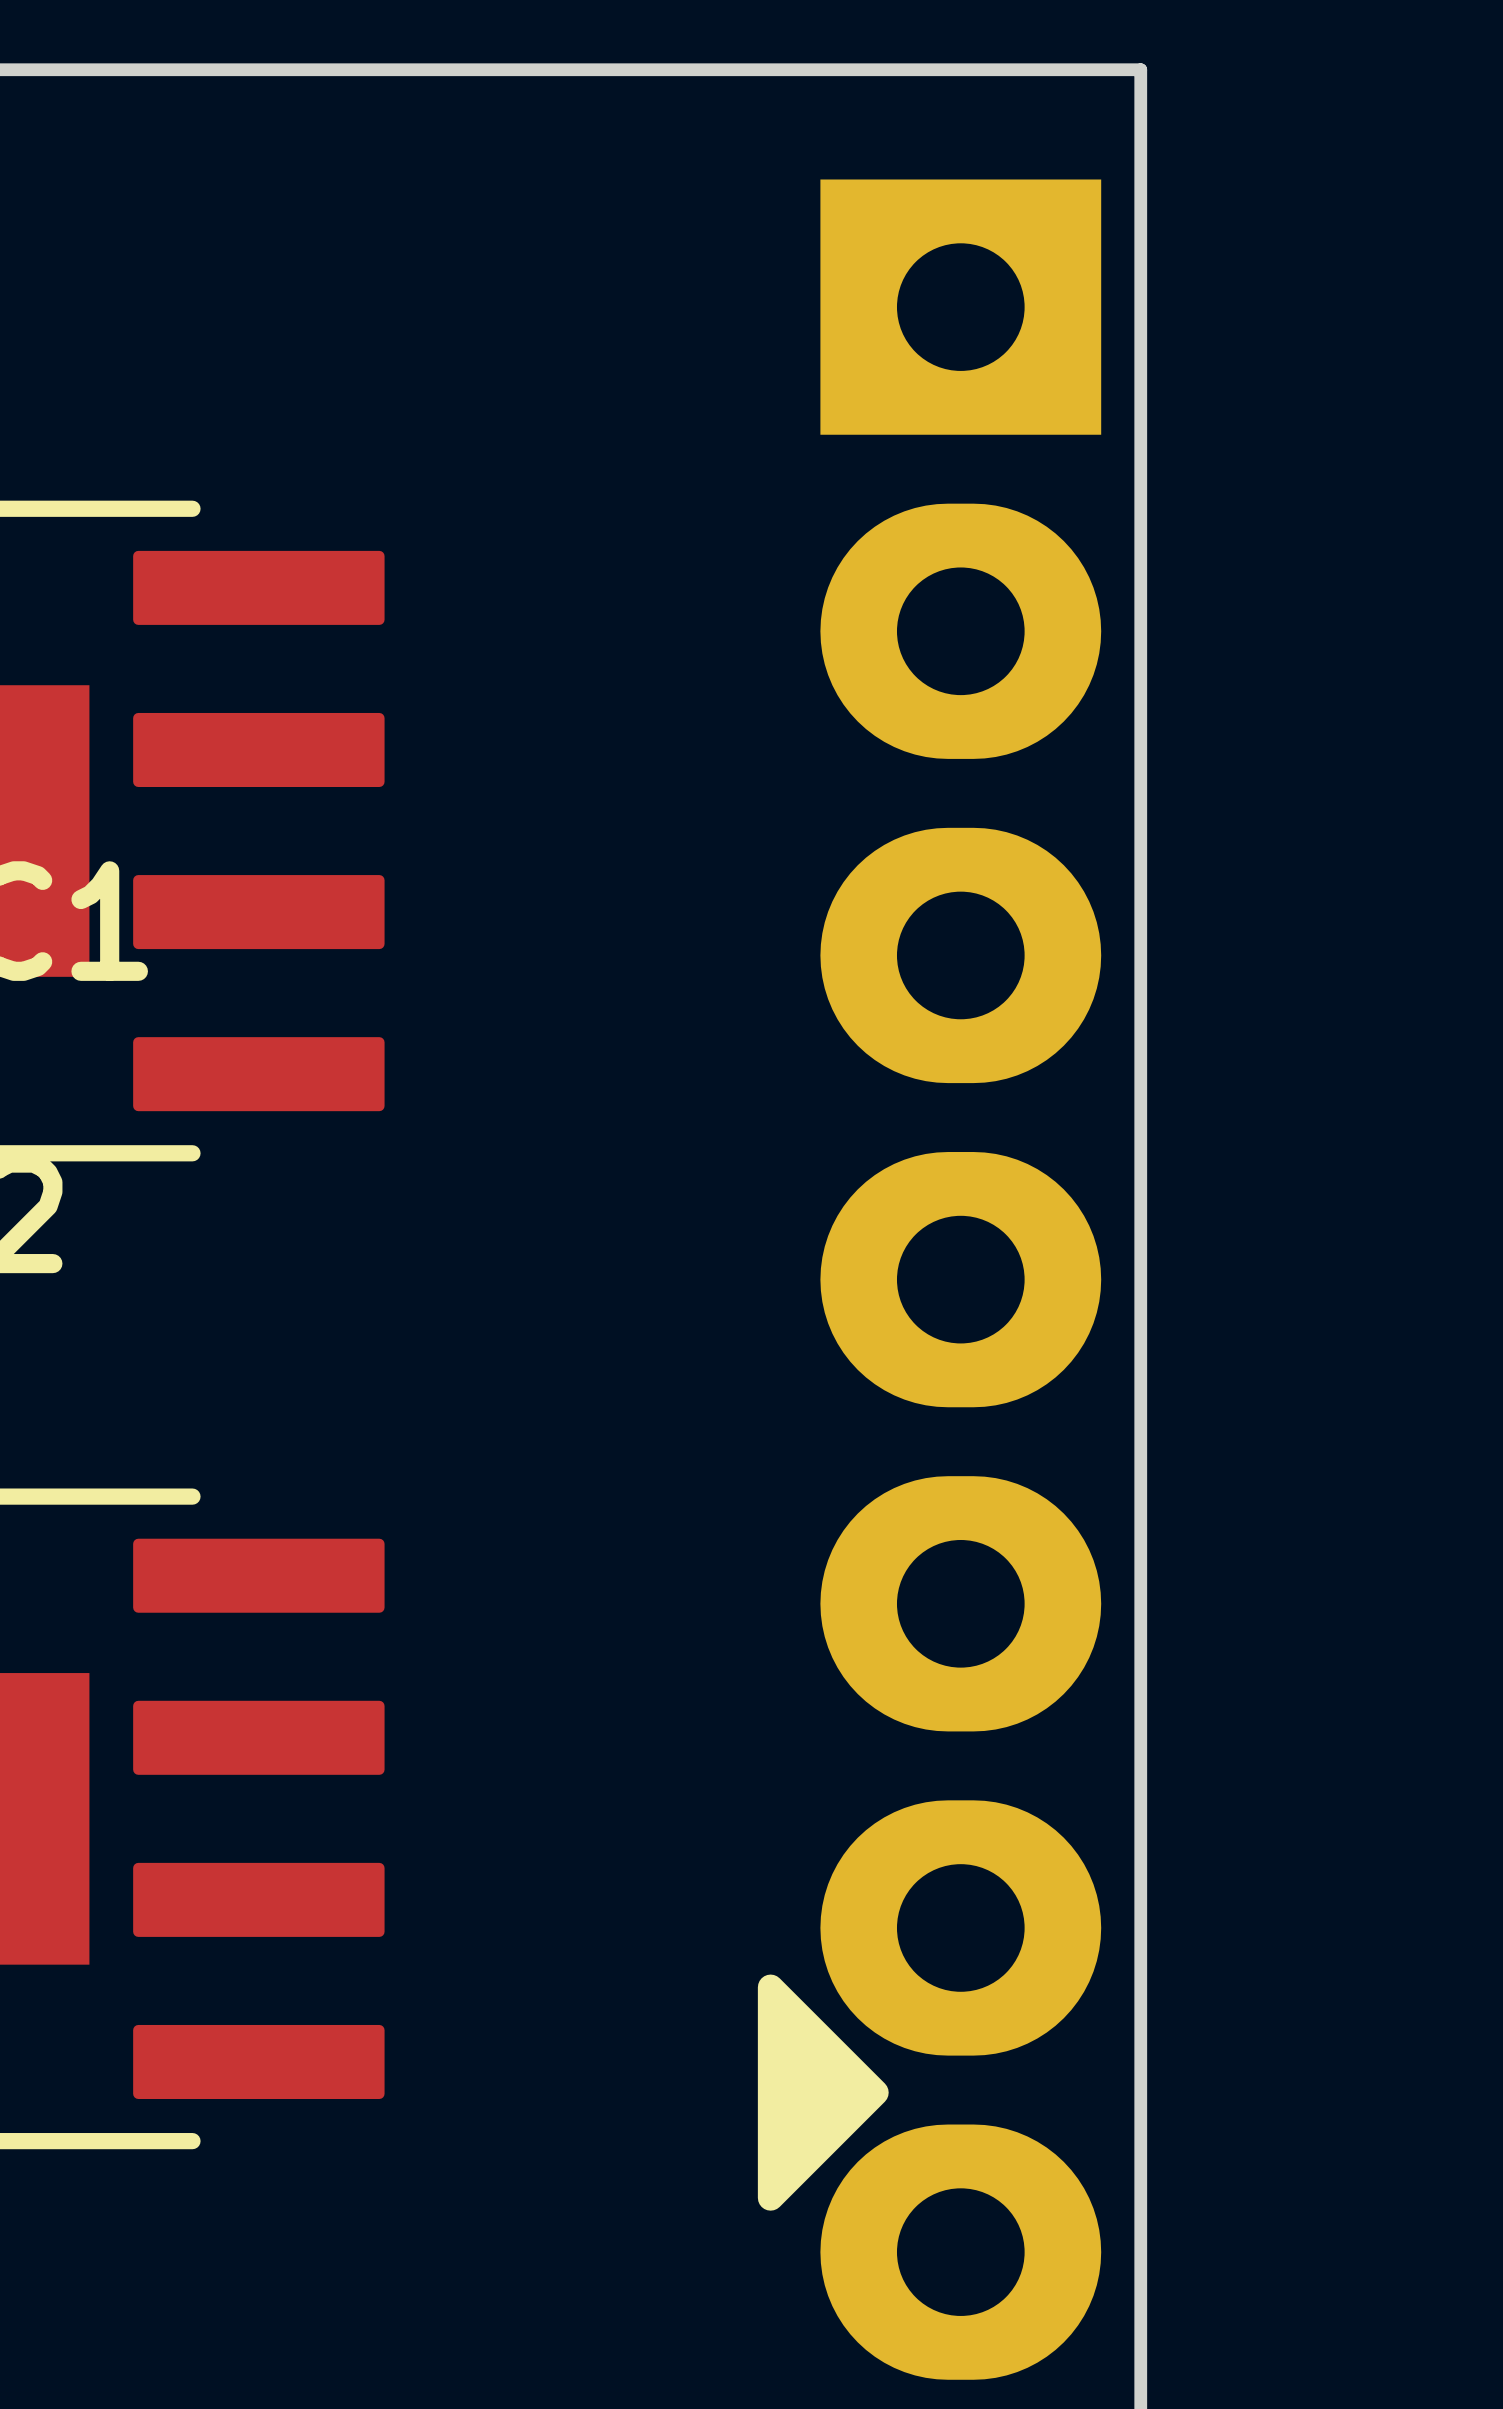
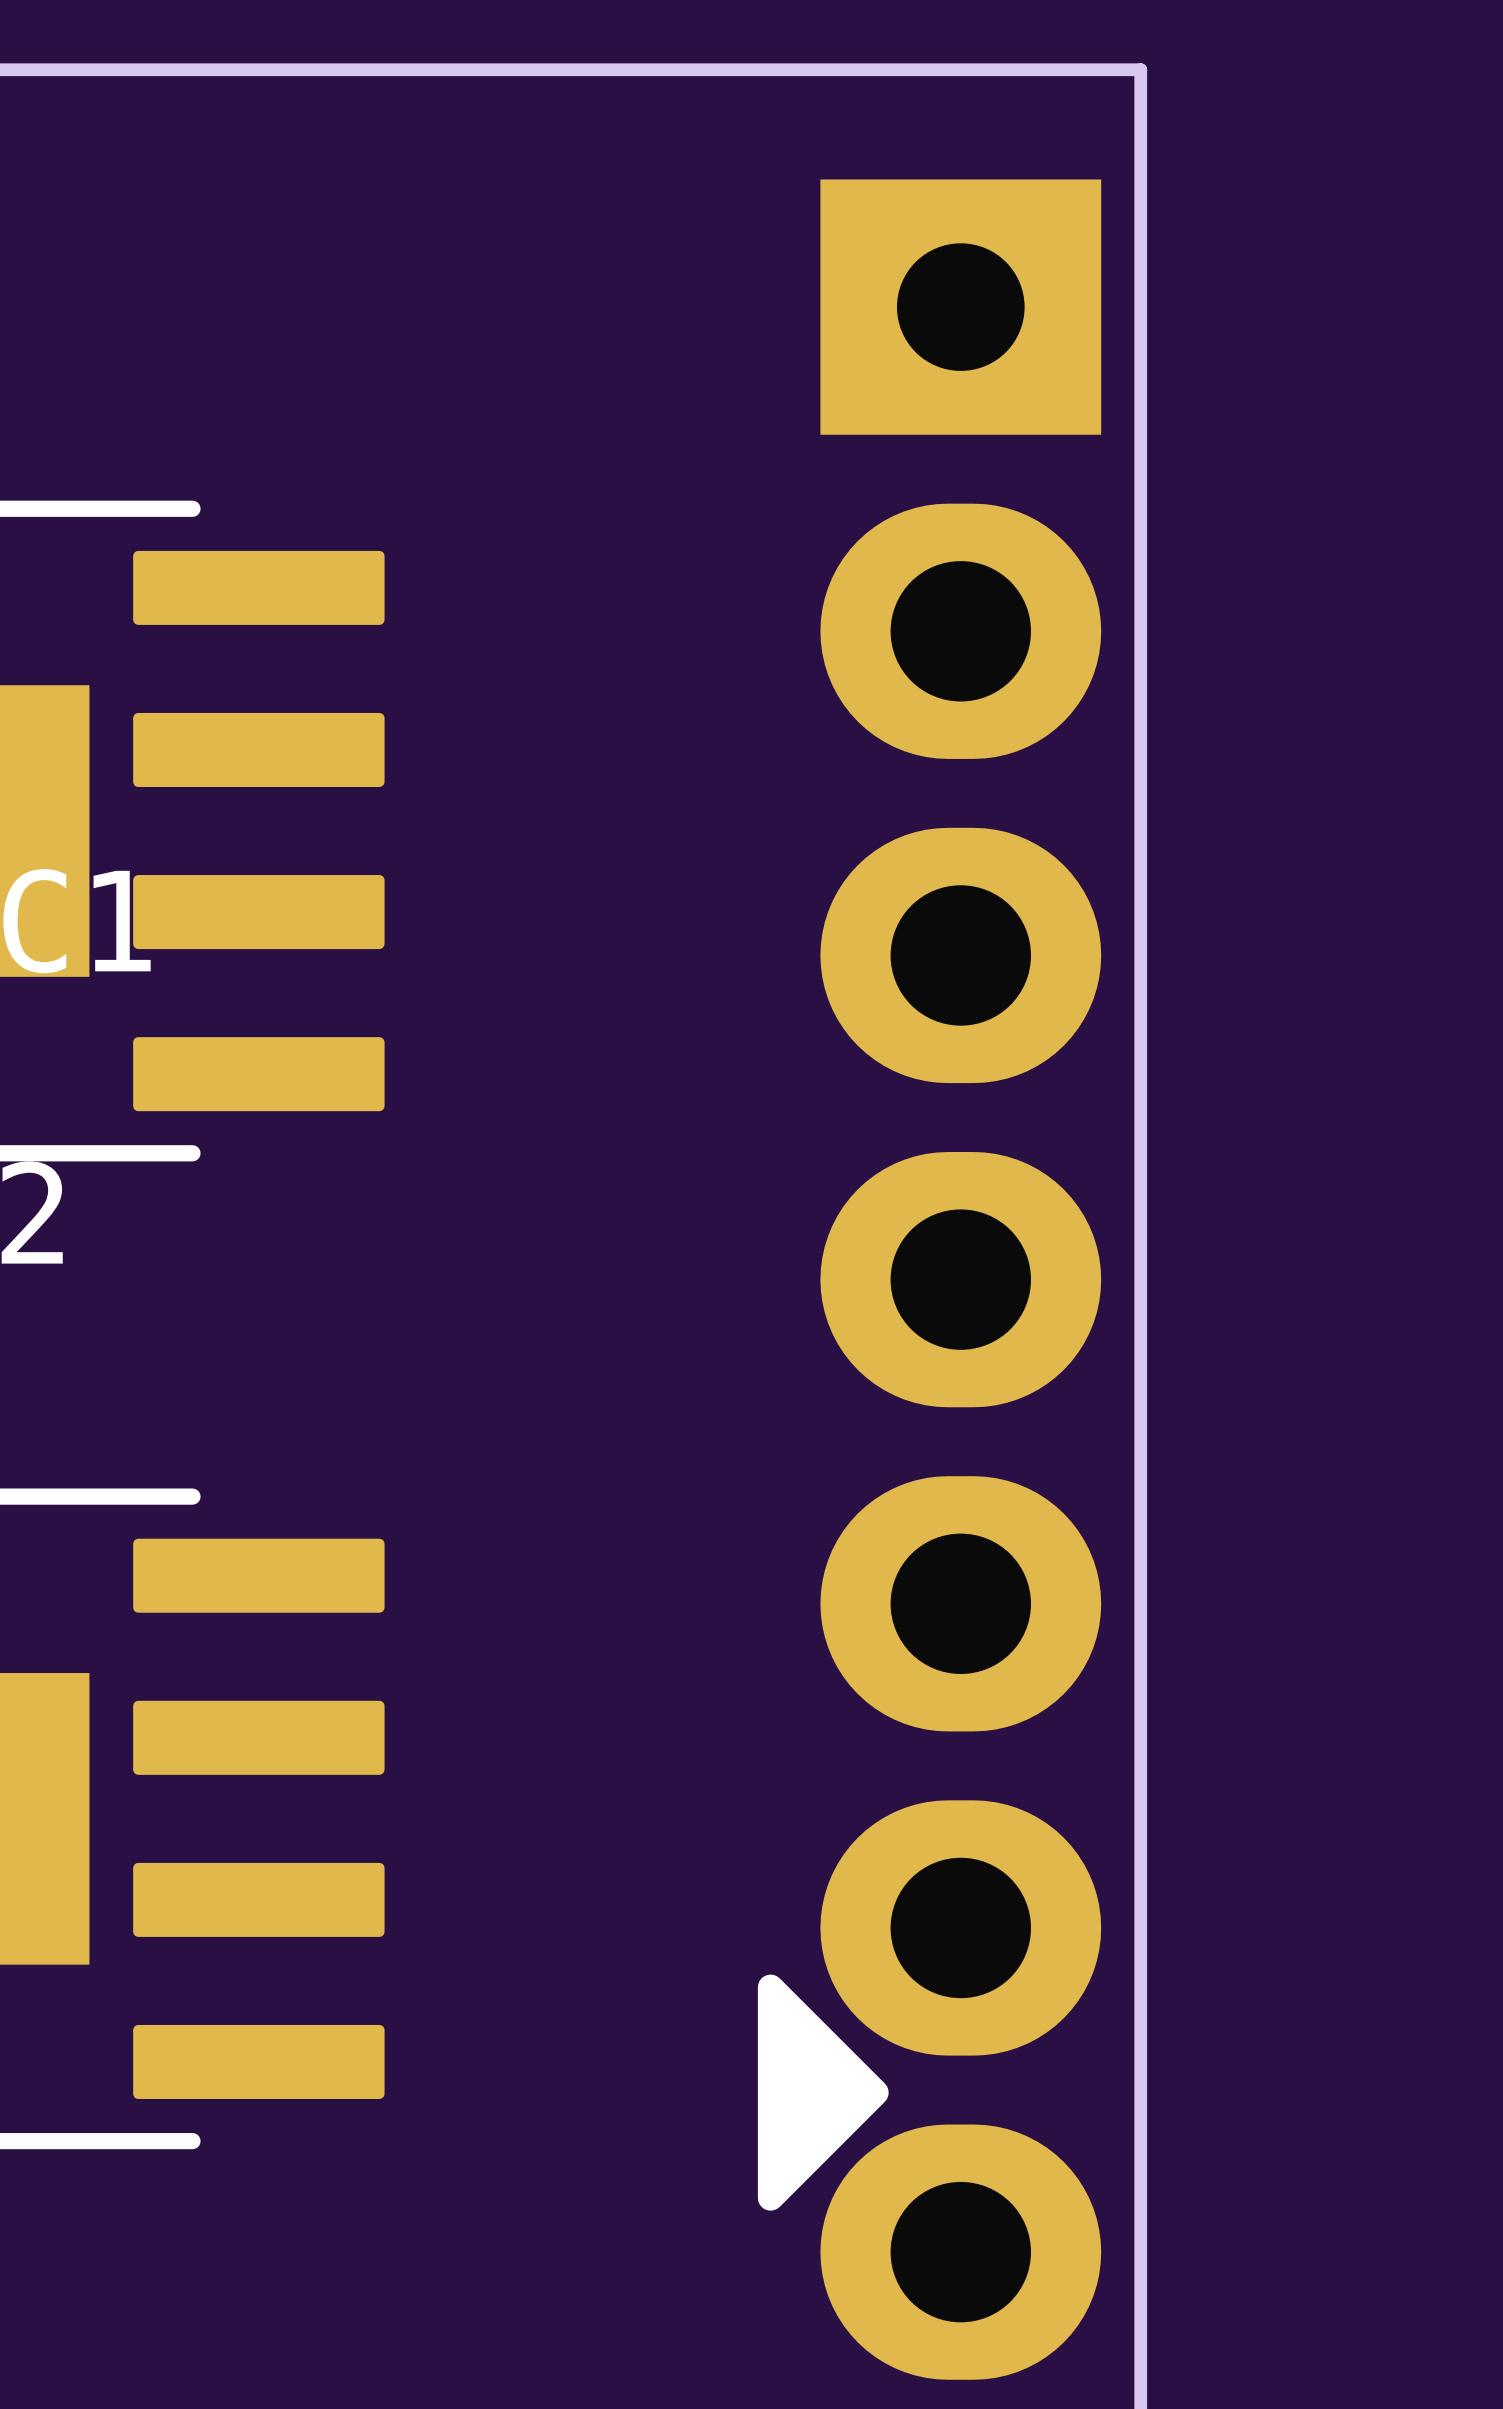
part footprint: [820, 179, 1102, 2380] -> [820, 179, 1102, 2380]

